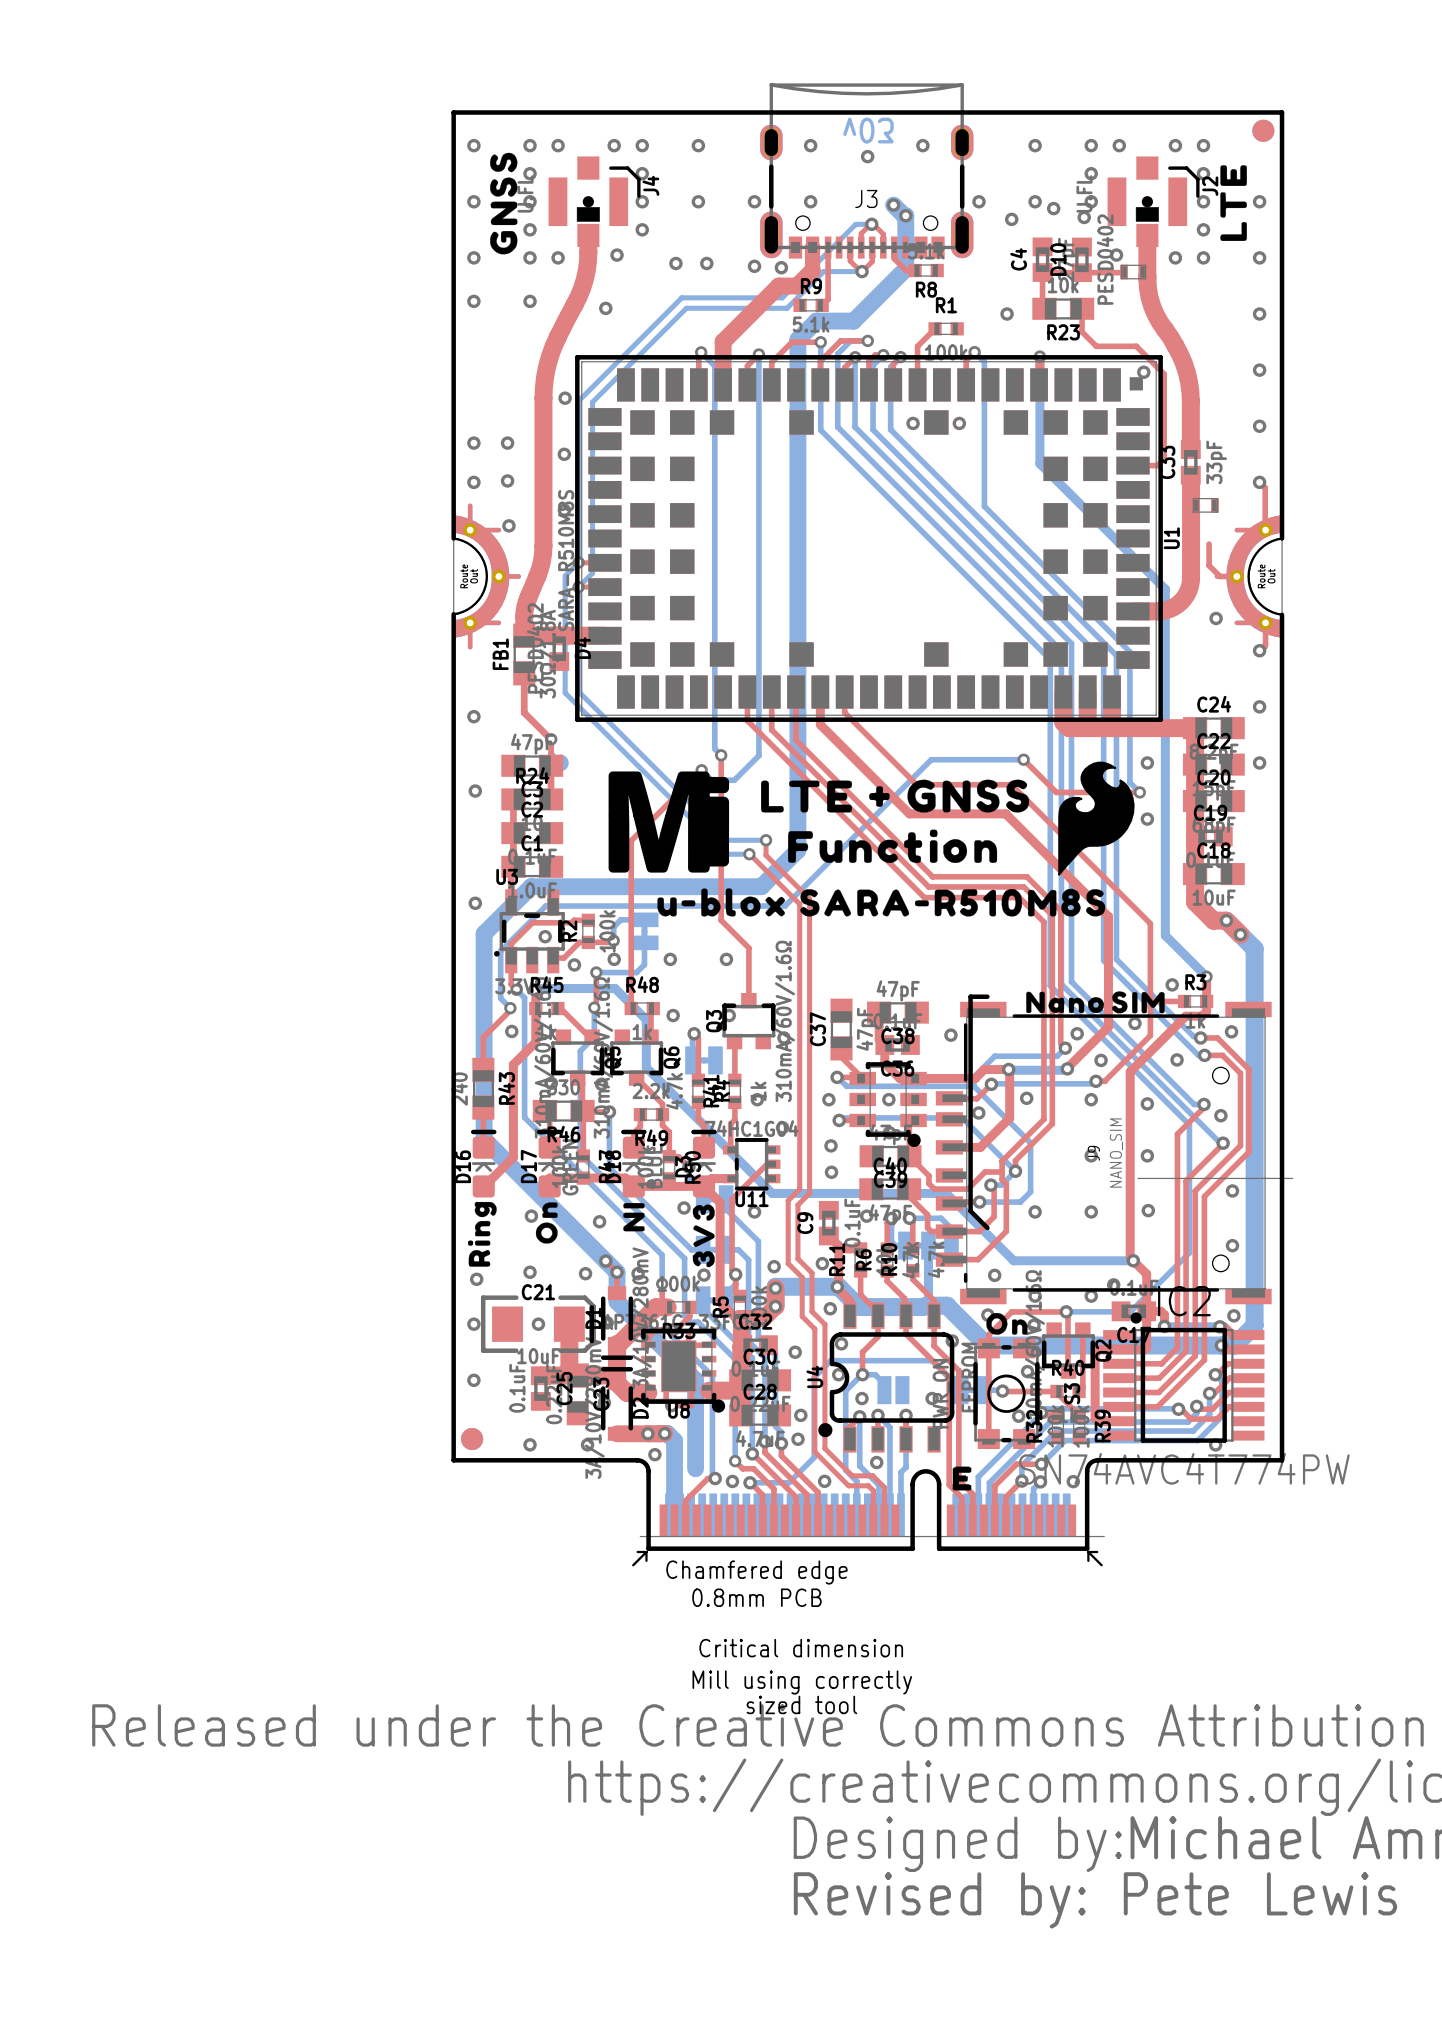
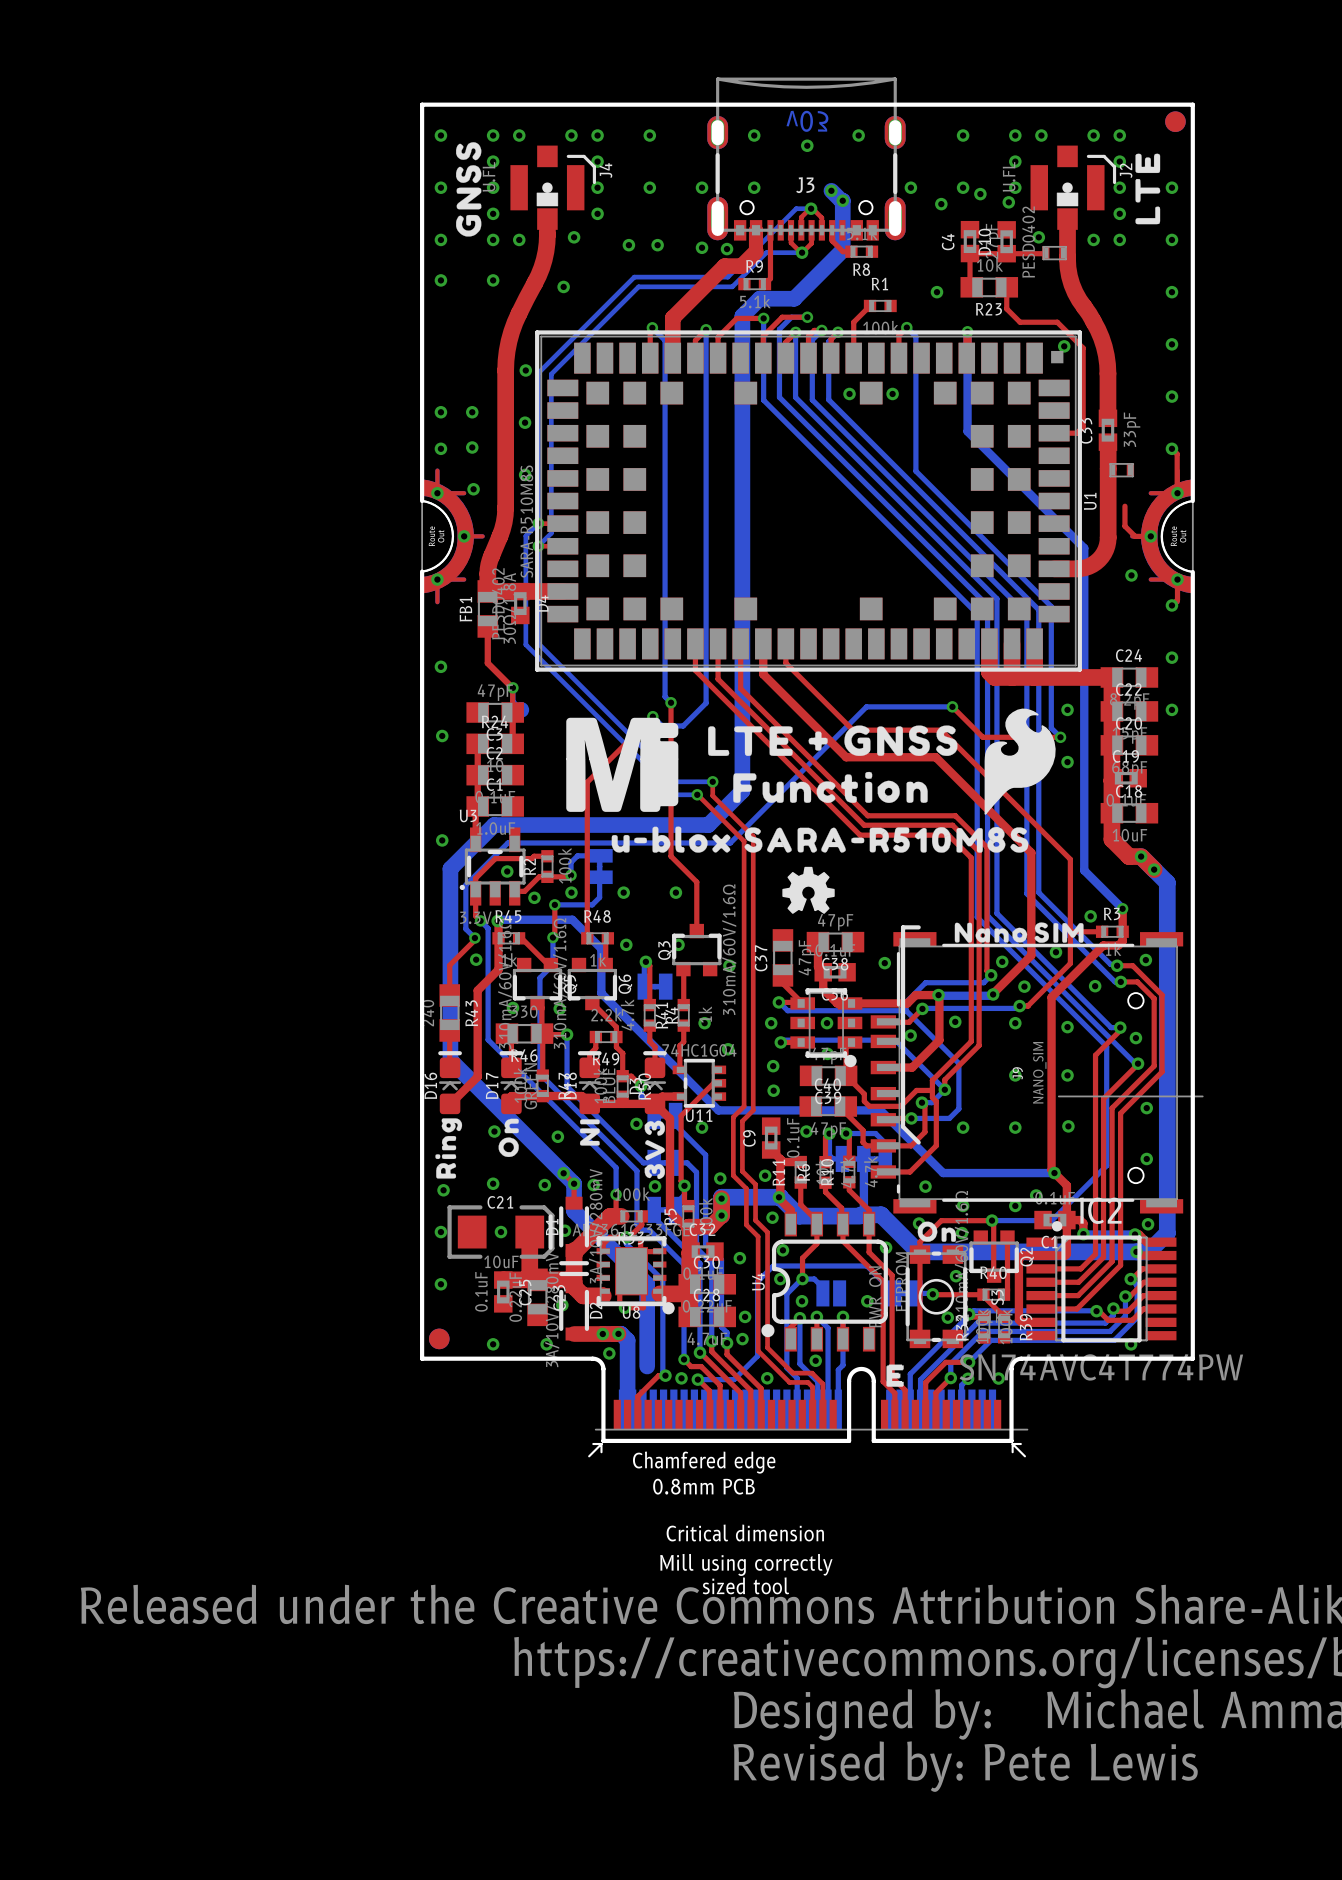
drawing: none -> [782, 866, 835, 914]

